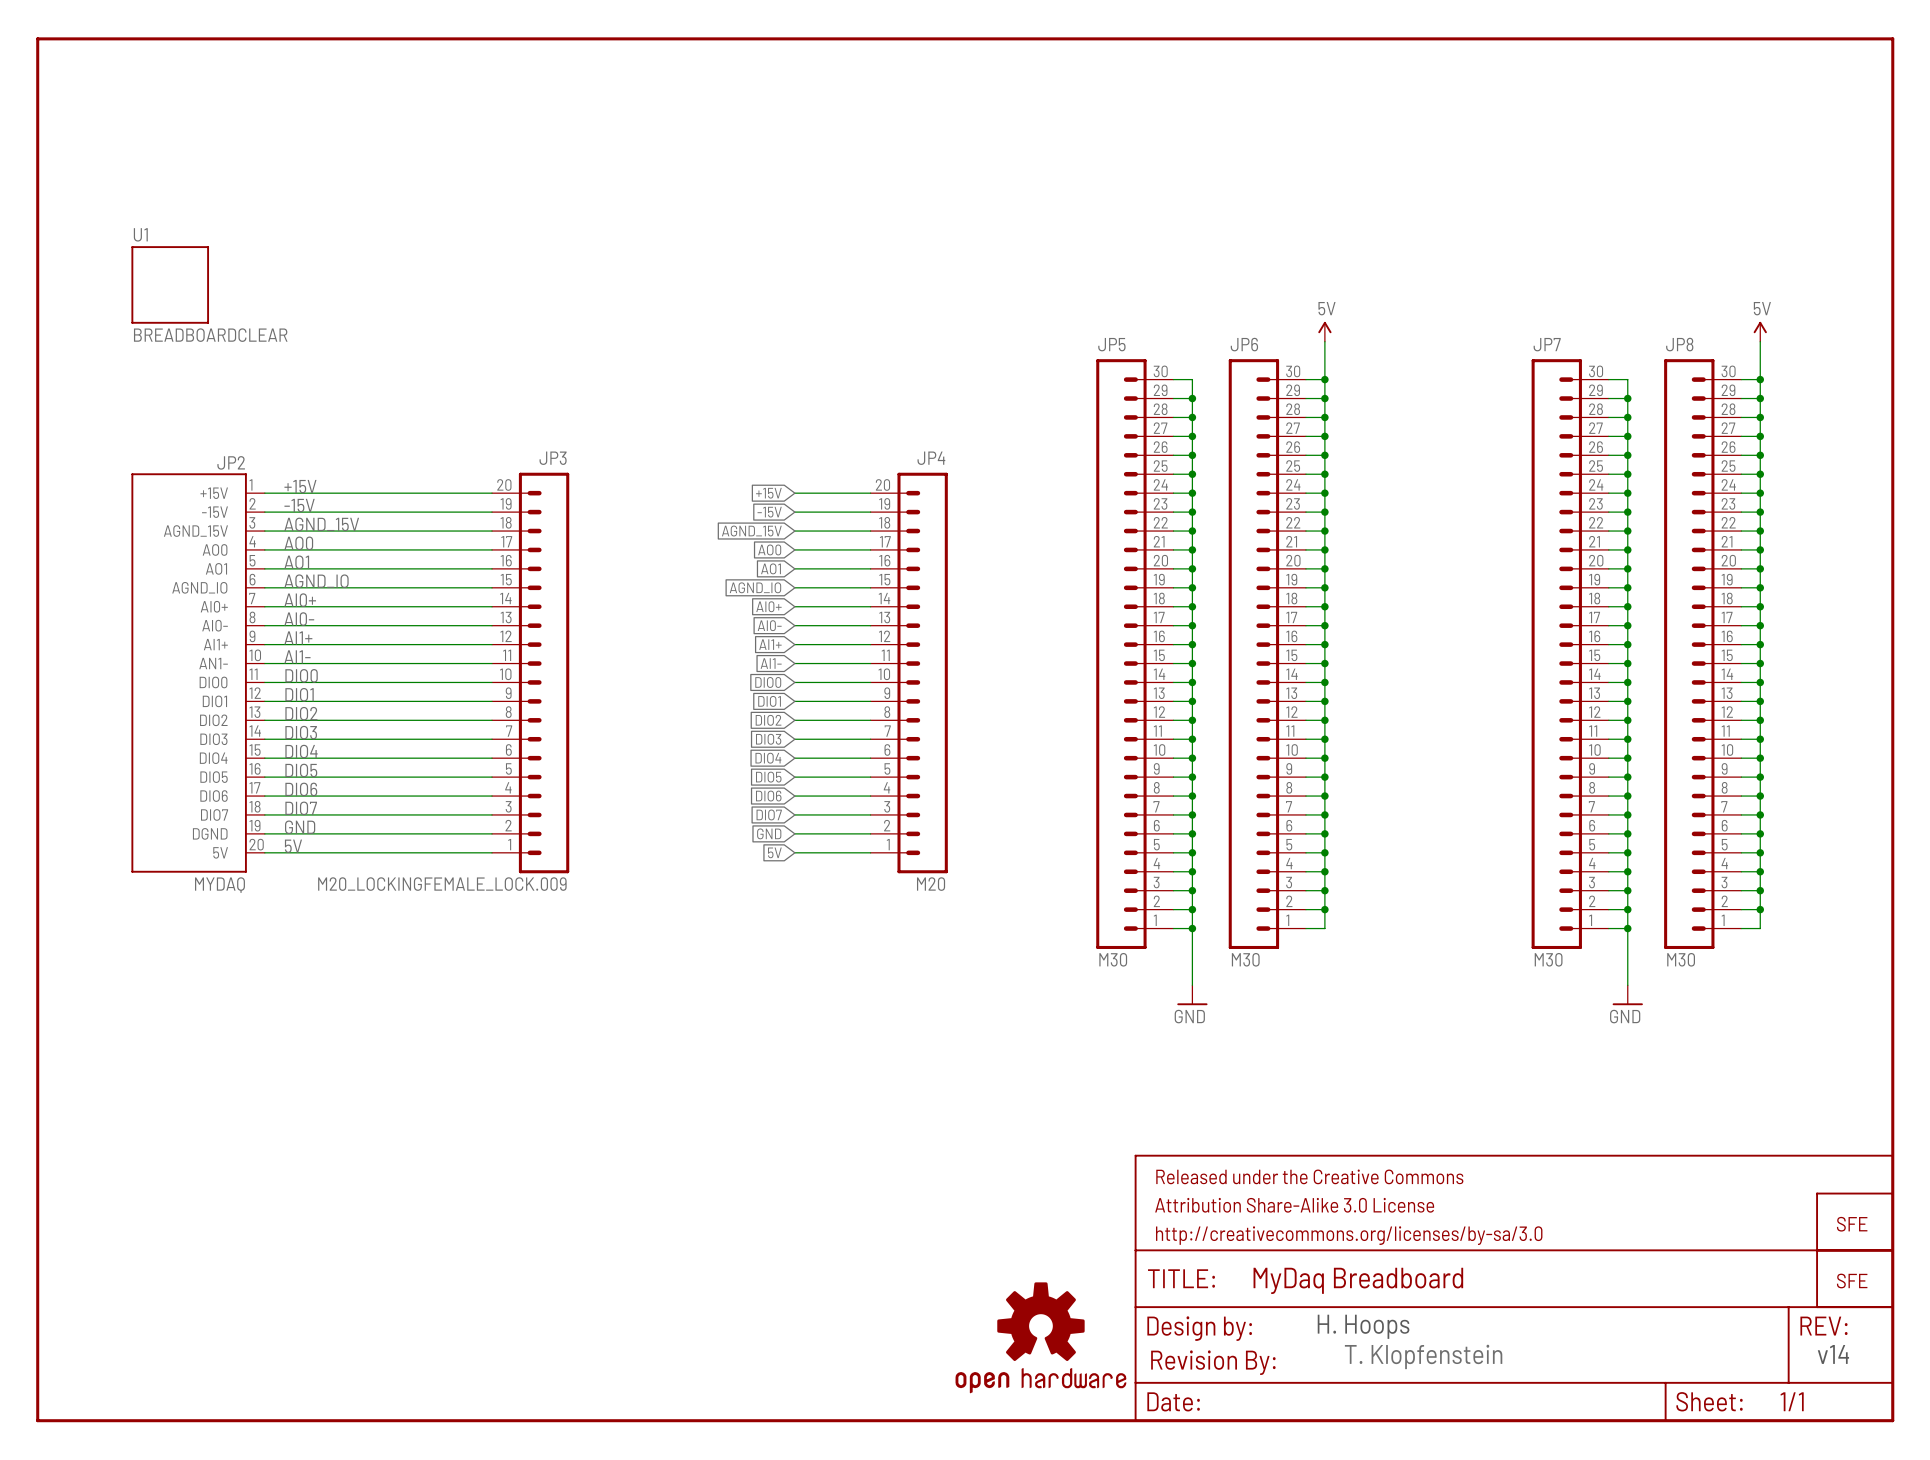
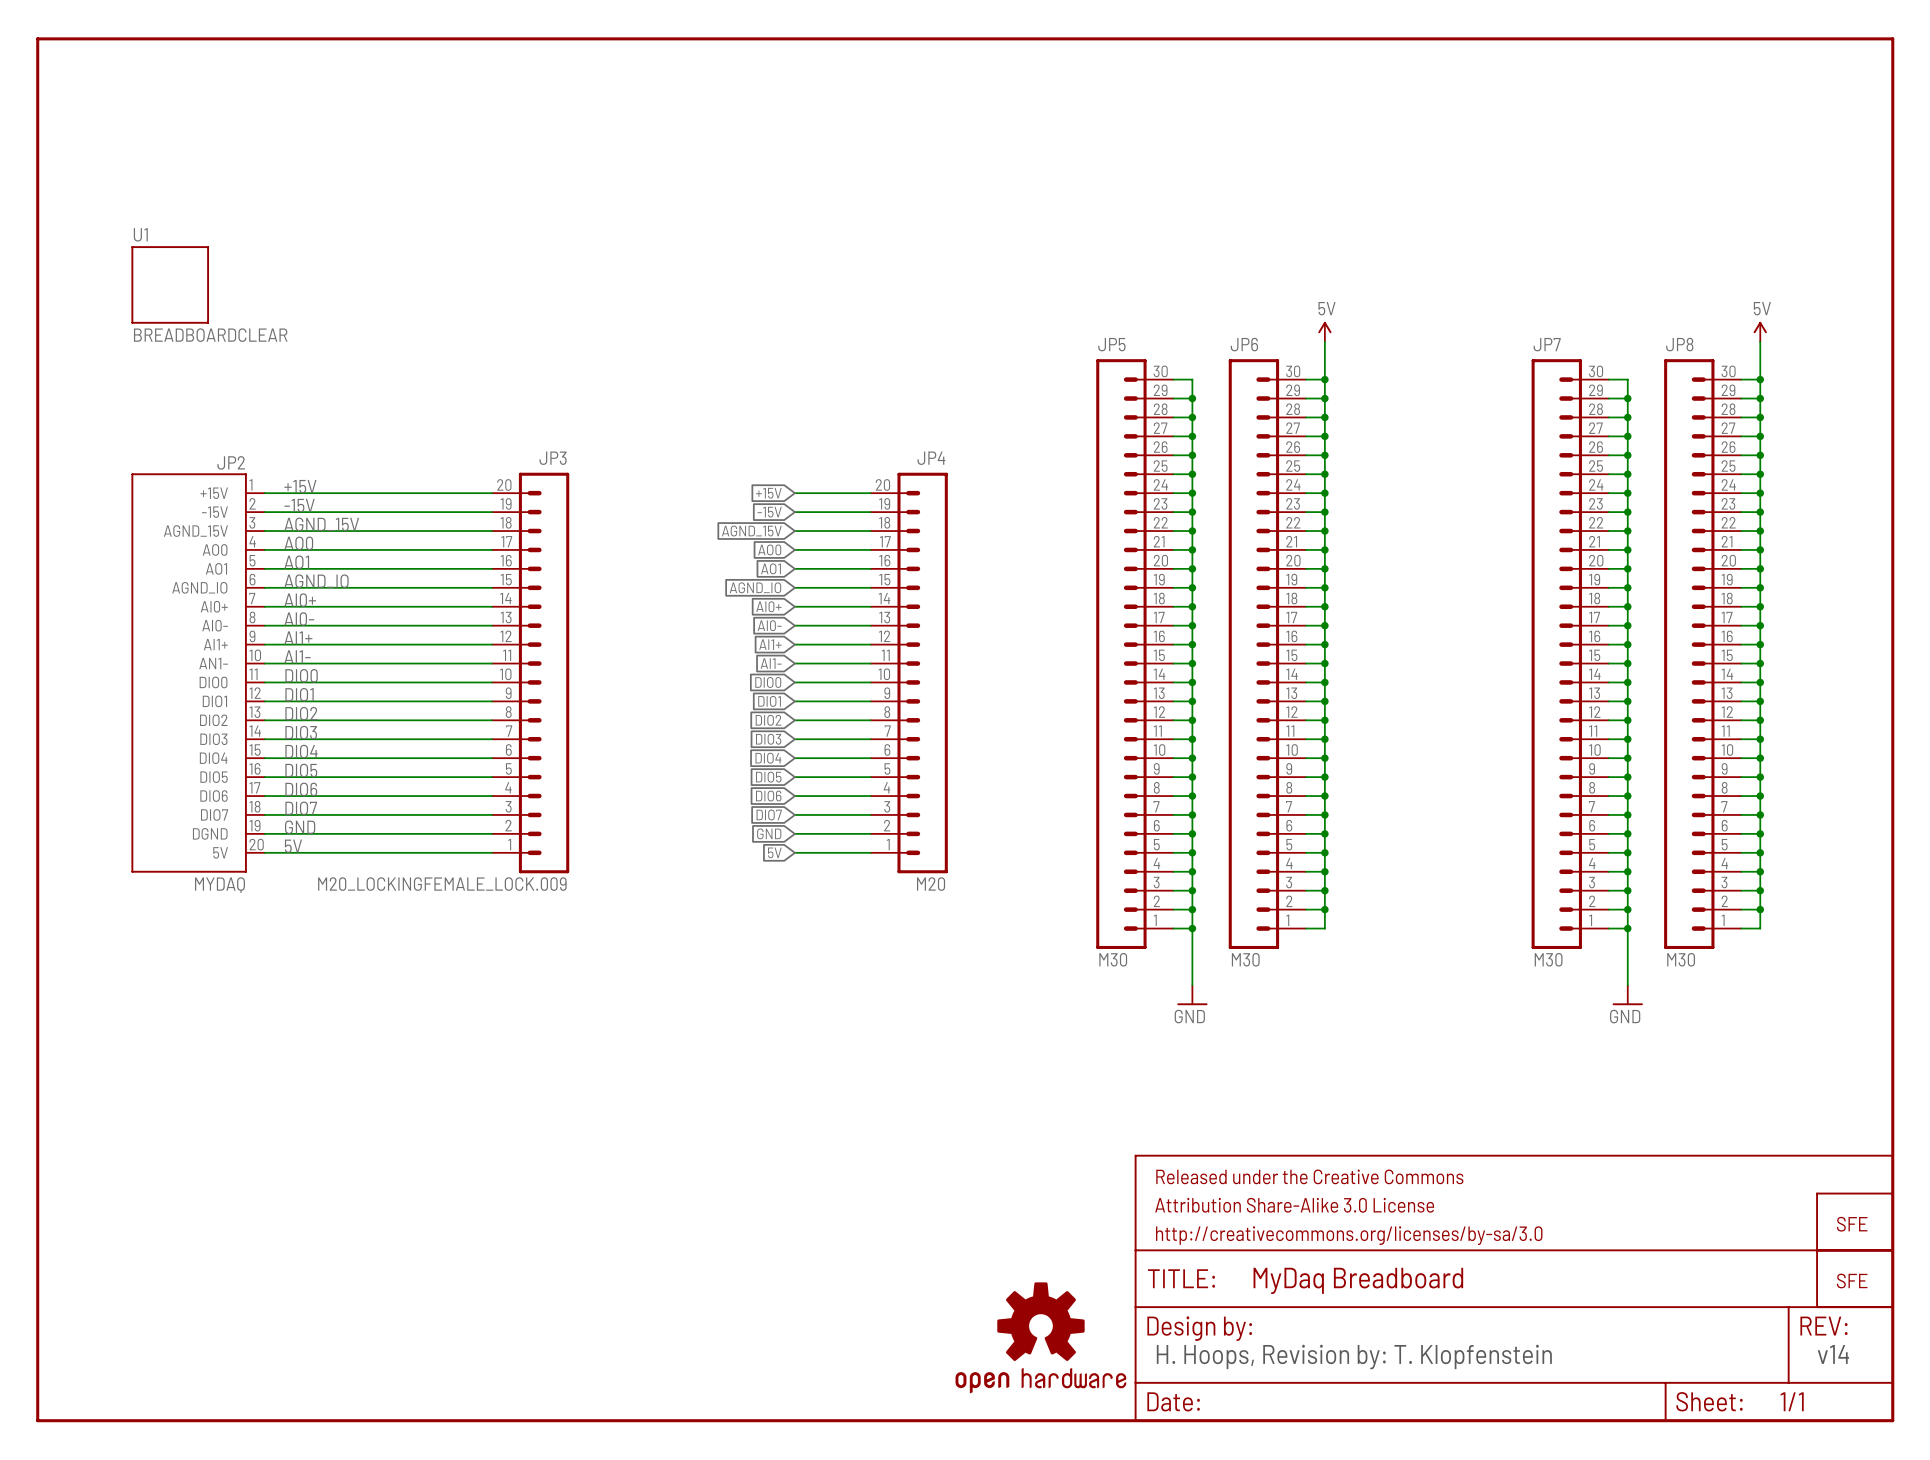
text: H. Hoops (1363, 1326) -> none
text: T. Klopfenstein (1423, 1356) -> none
text: none -> H. Hoops, Revision by: T. Klopfenstein (1354, 1357)
part: (1213, 1362) -> none

